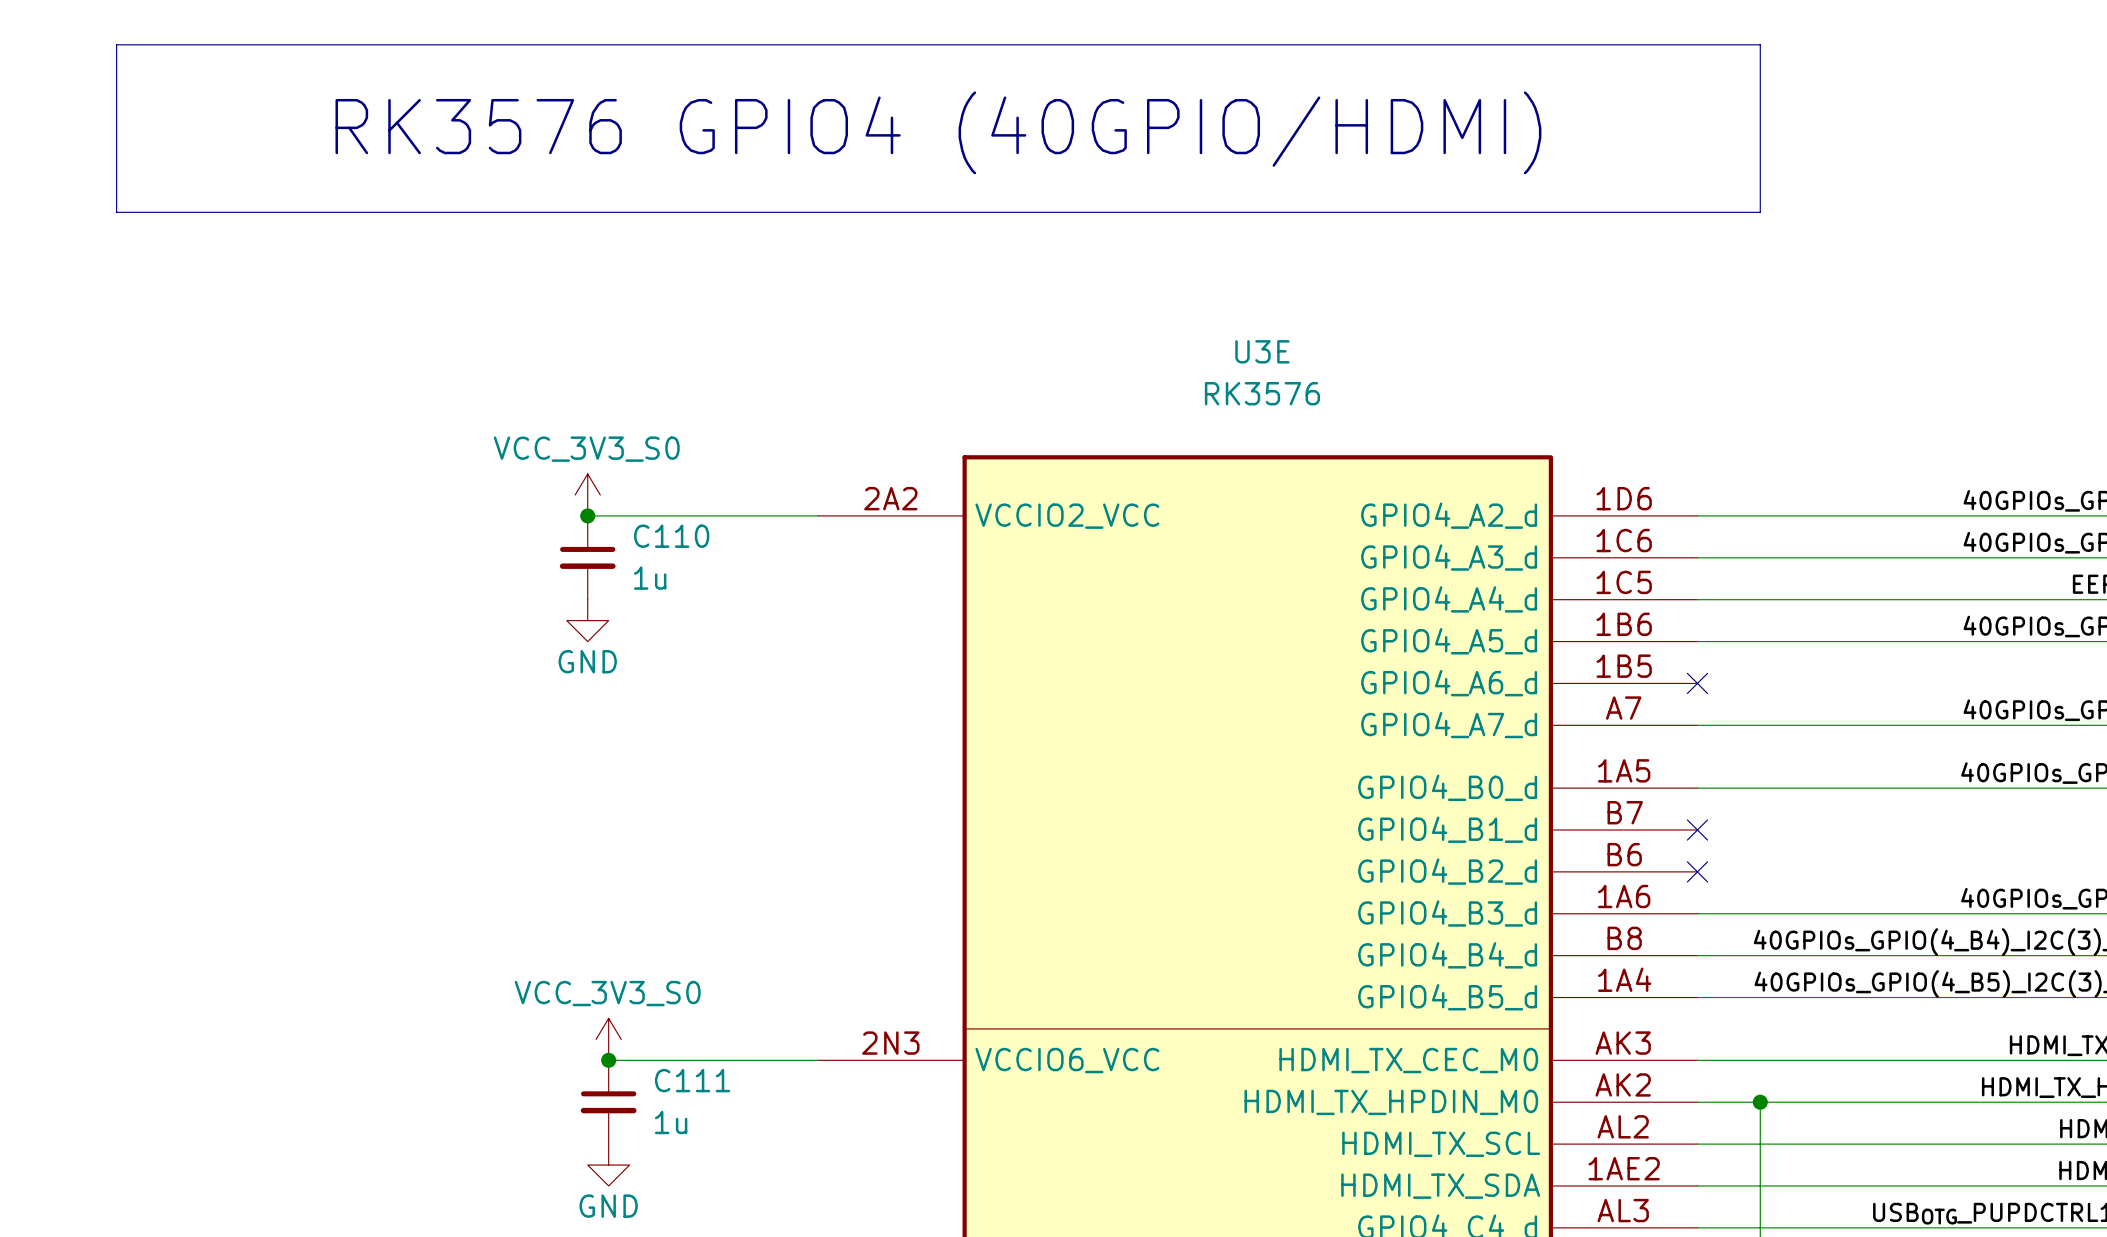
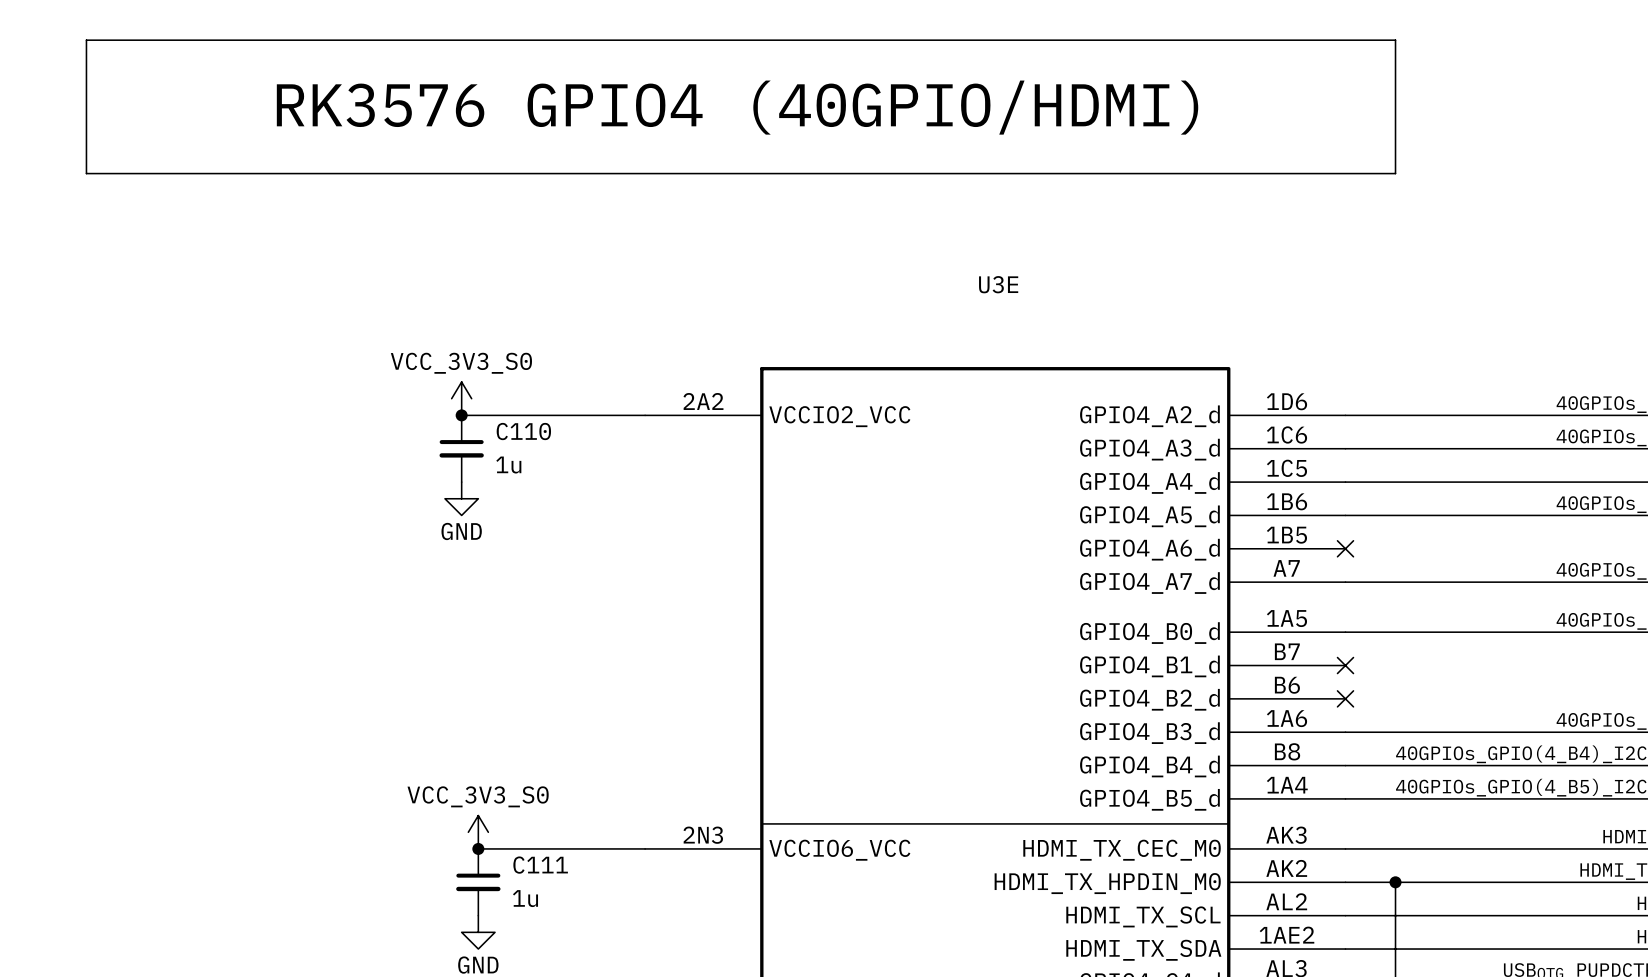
U3E value: RK3576 (1262, 393) -> none

